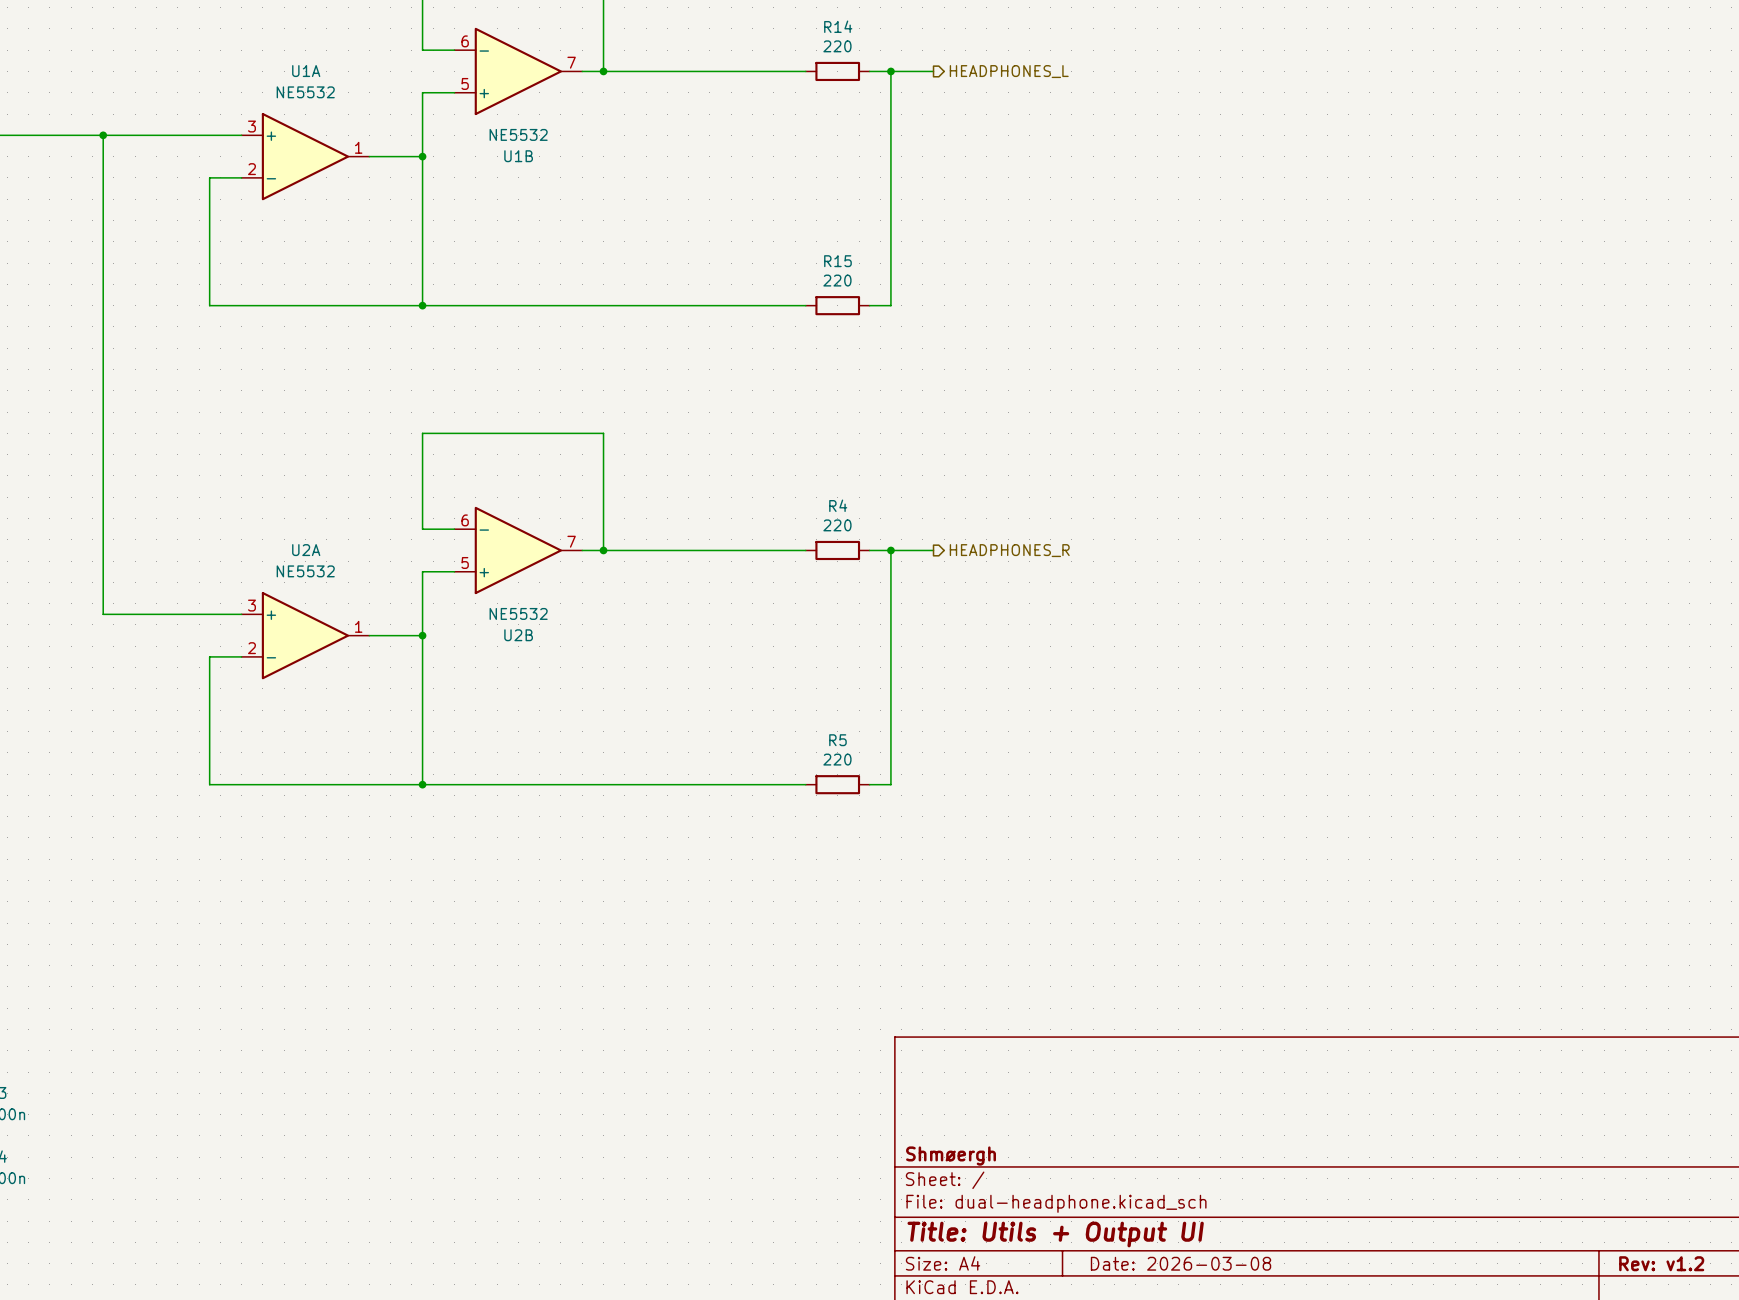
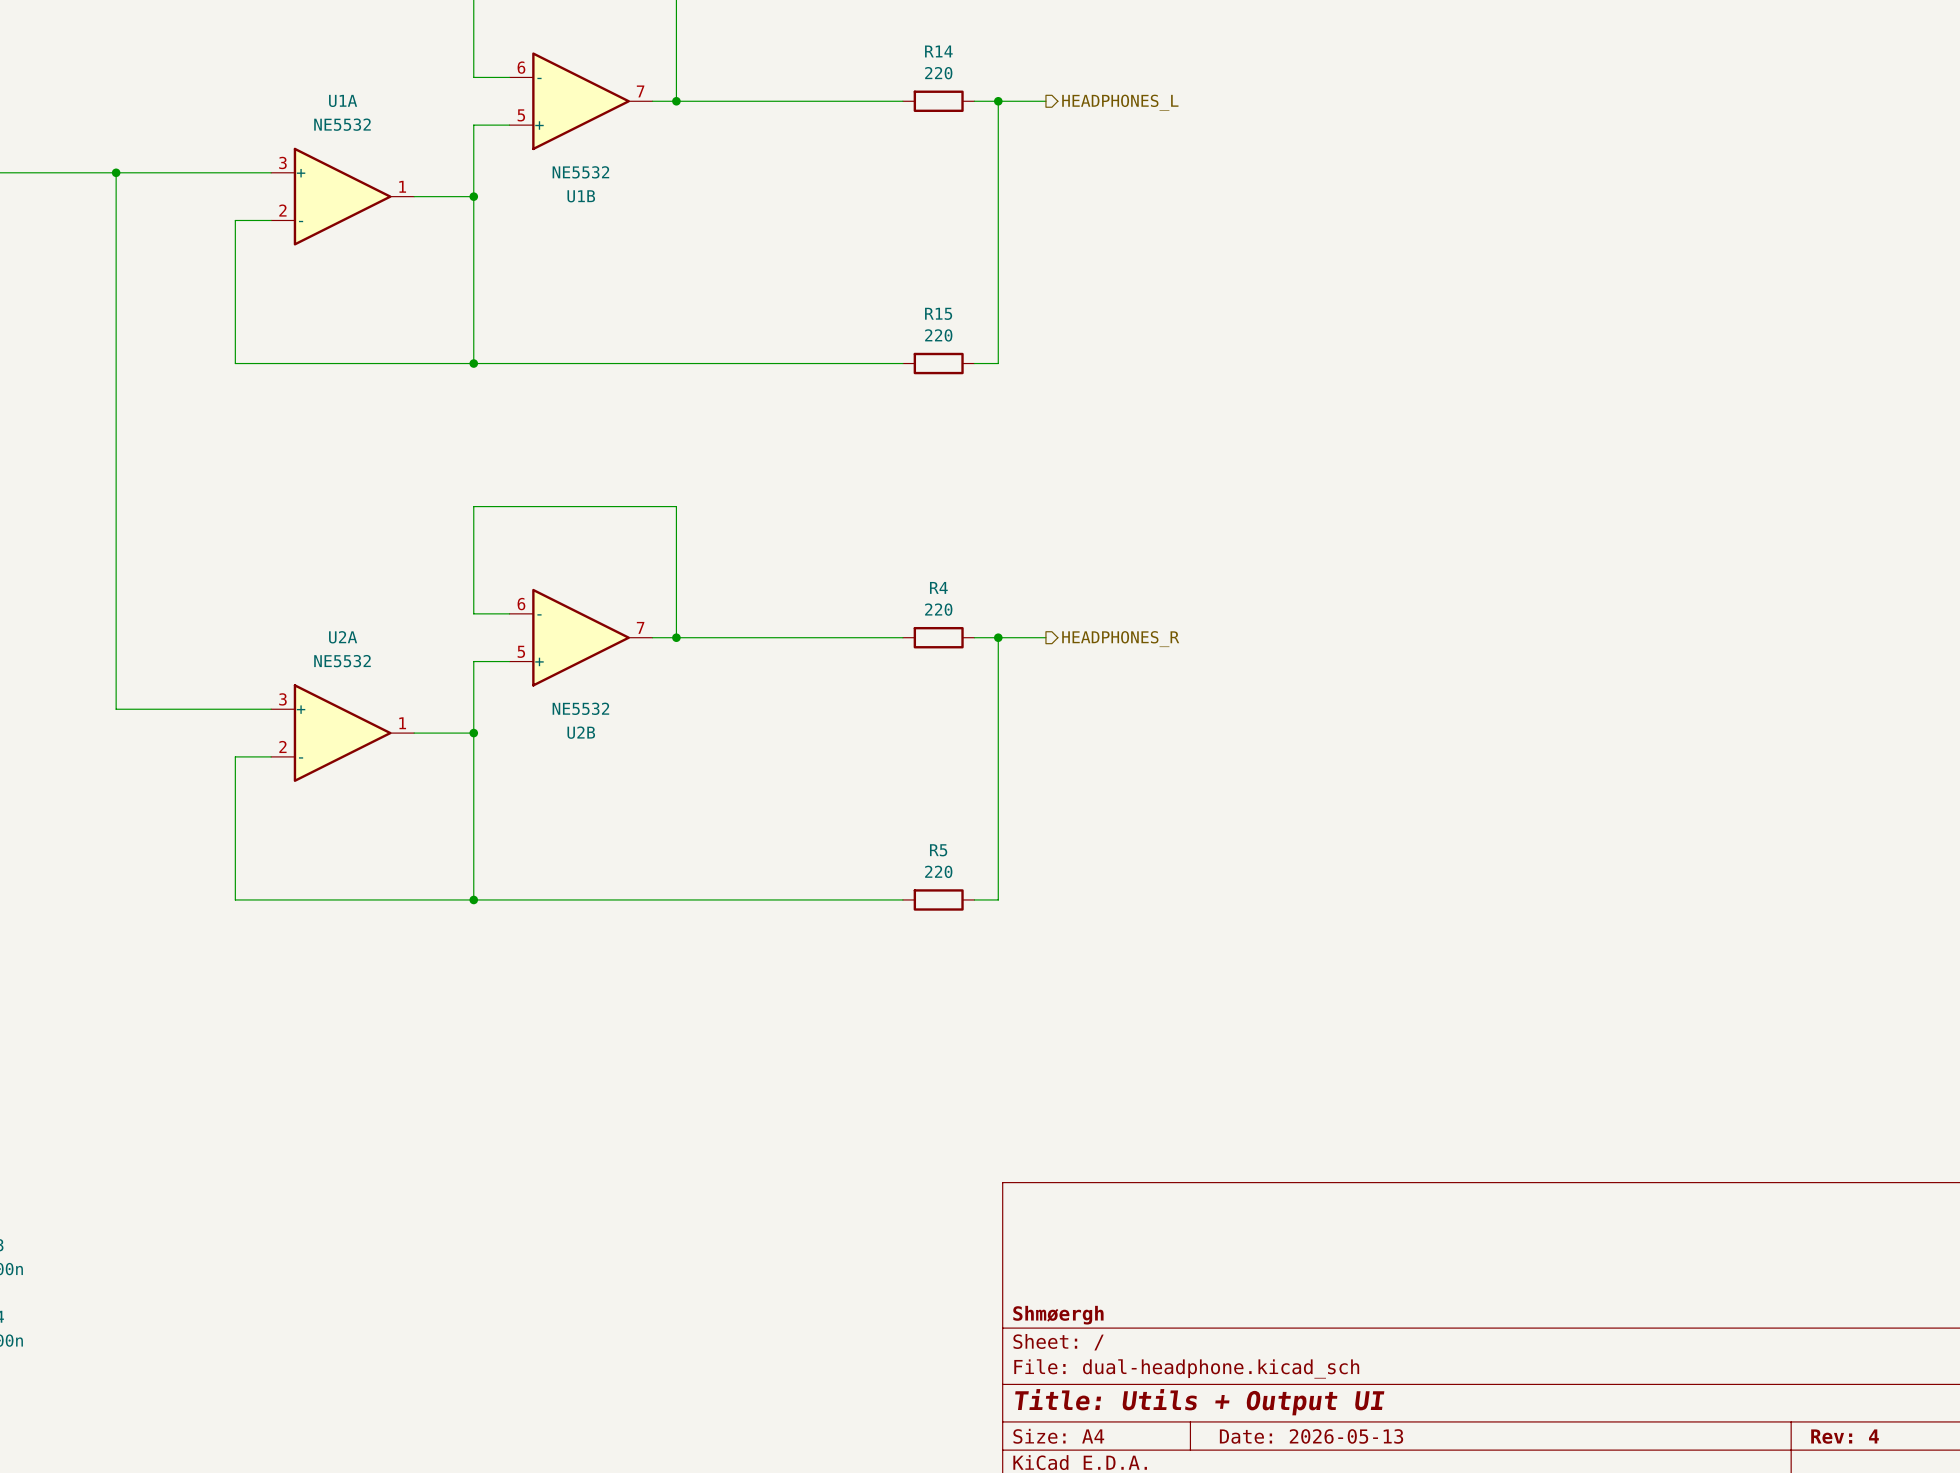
title block: Date: 2026-03-08 (1181, 1263) -> Date: 2026-05-13 (1311, 1436)
title block: Rev: v1.2 (1661, 1263) -> Rev: 4 (1845, 1436)

